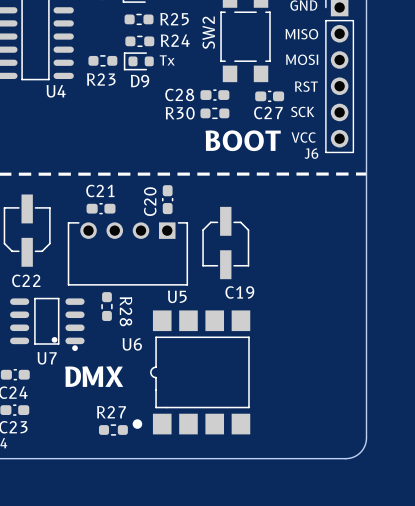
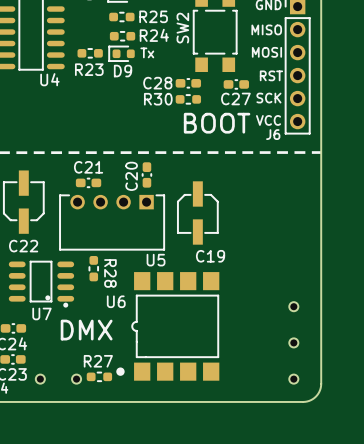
part: none -> (293, 306)
part: none -> (293, 342)
part: none -> (40, 379)
part: none -> (76, 379)
part: none -> (293, 379)

